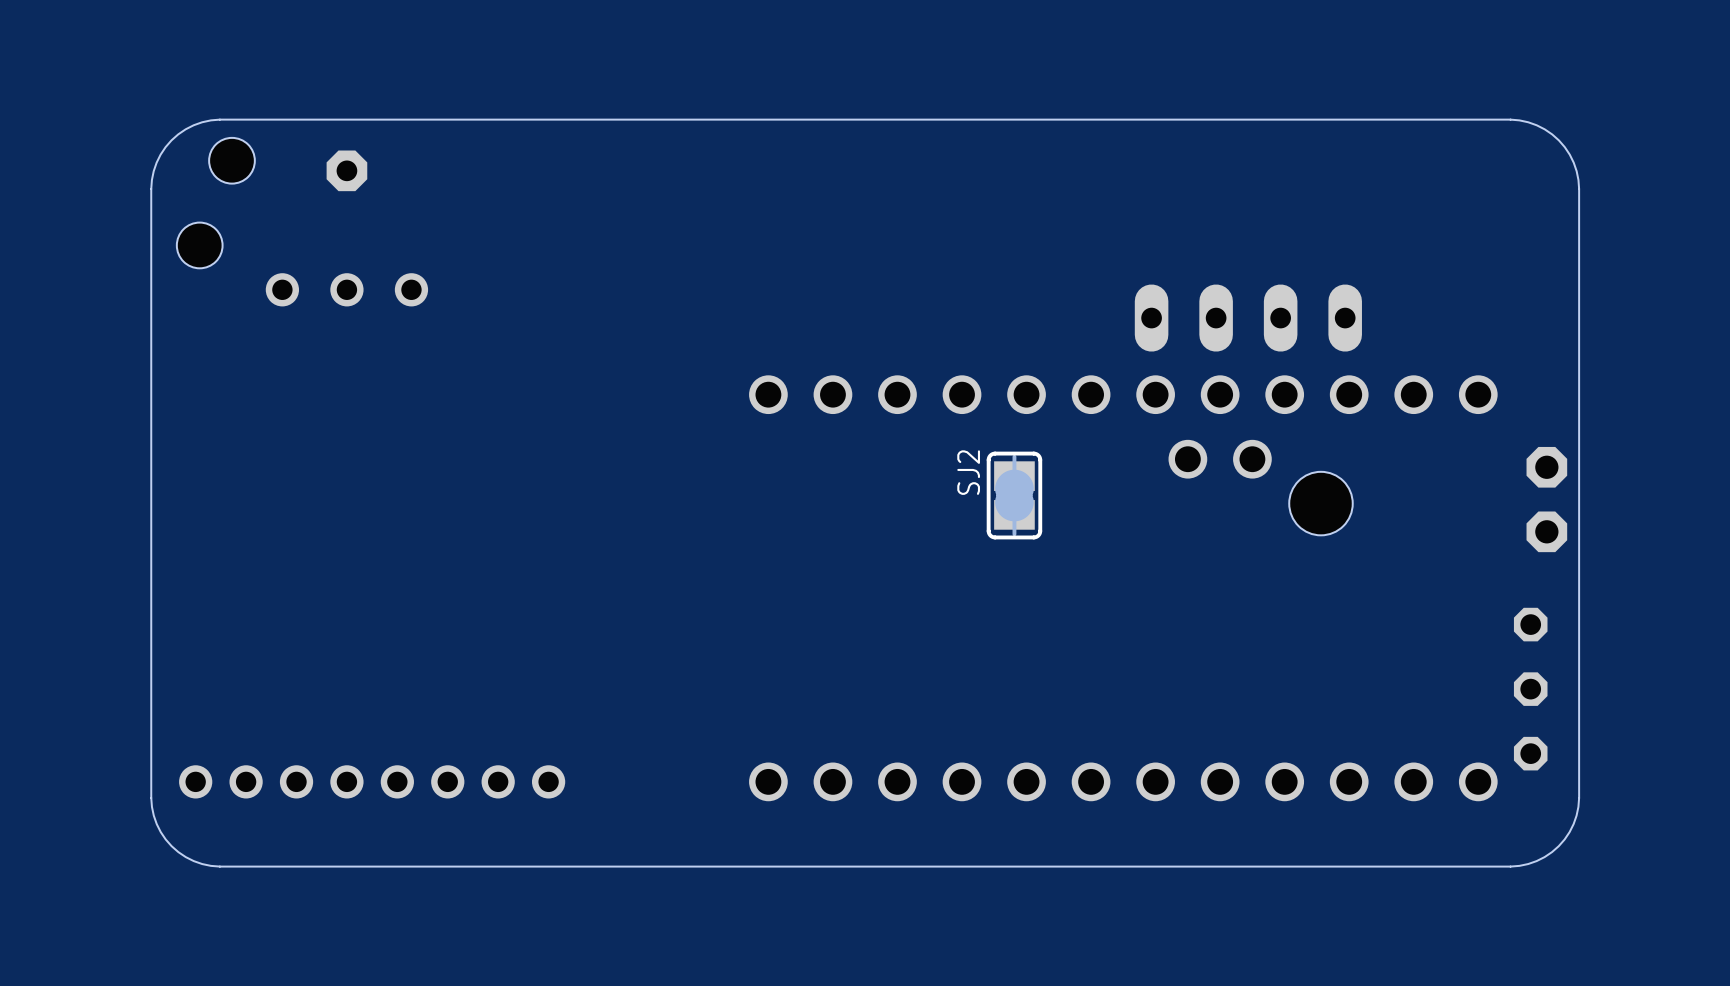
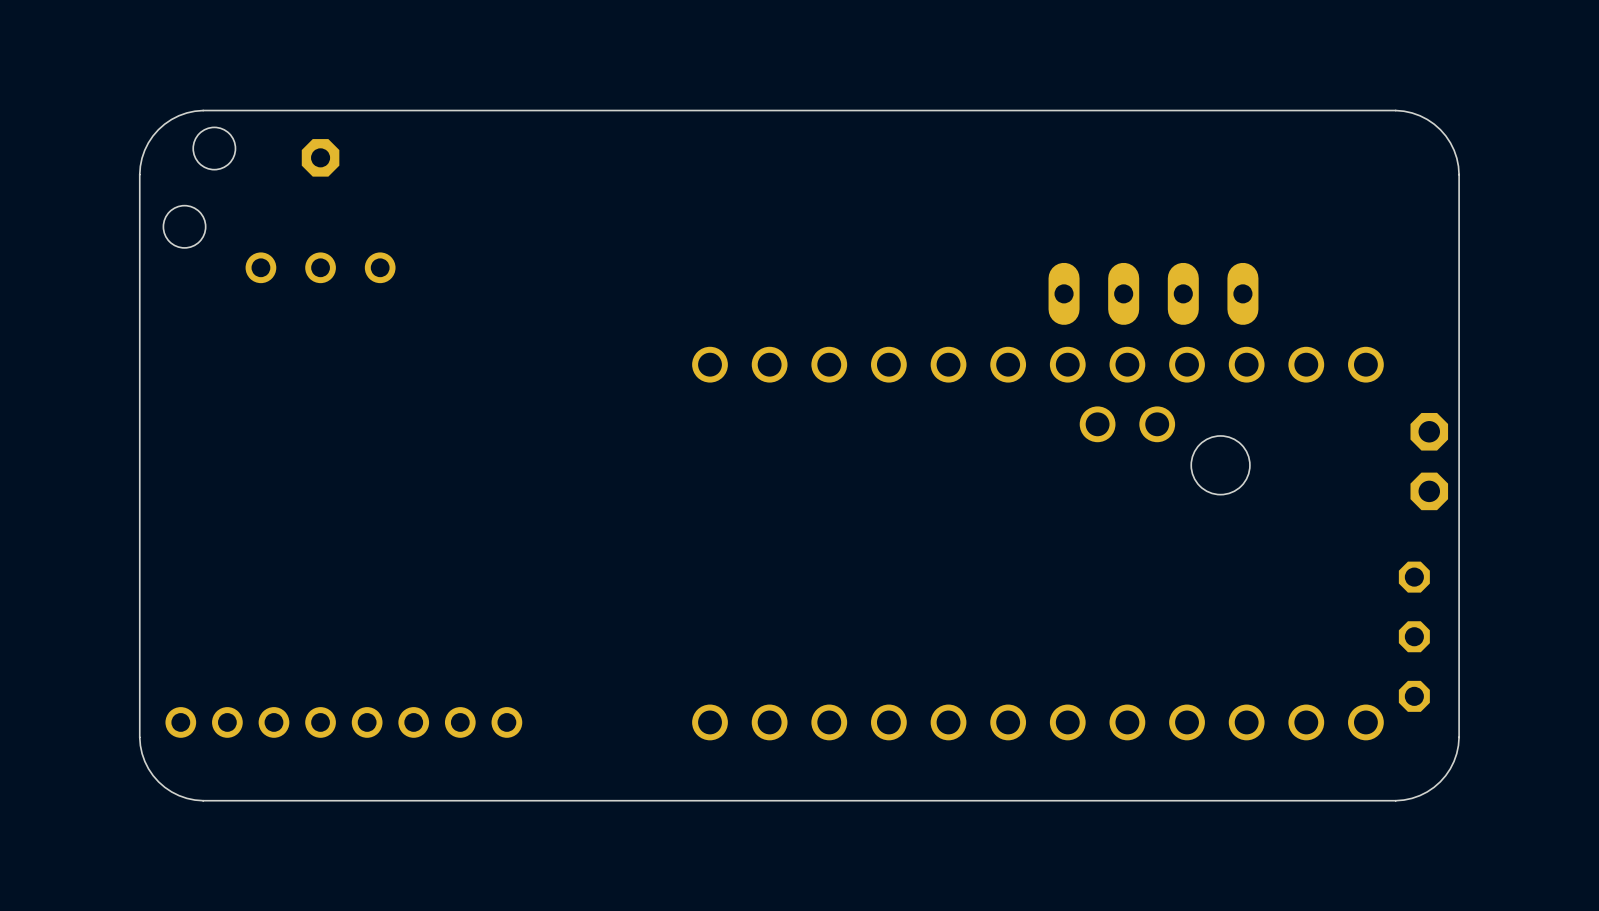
SJ2: (1014, 495) -> none

